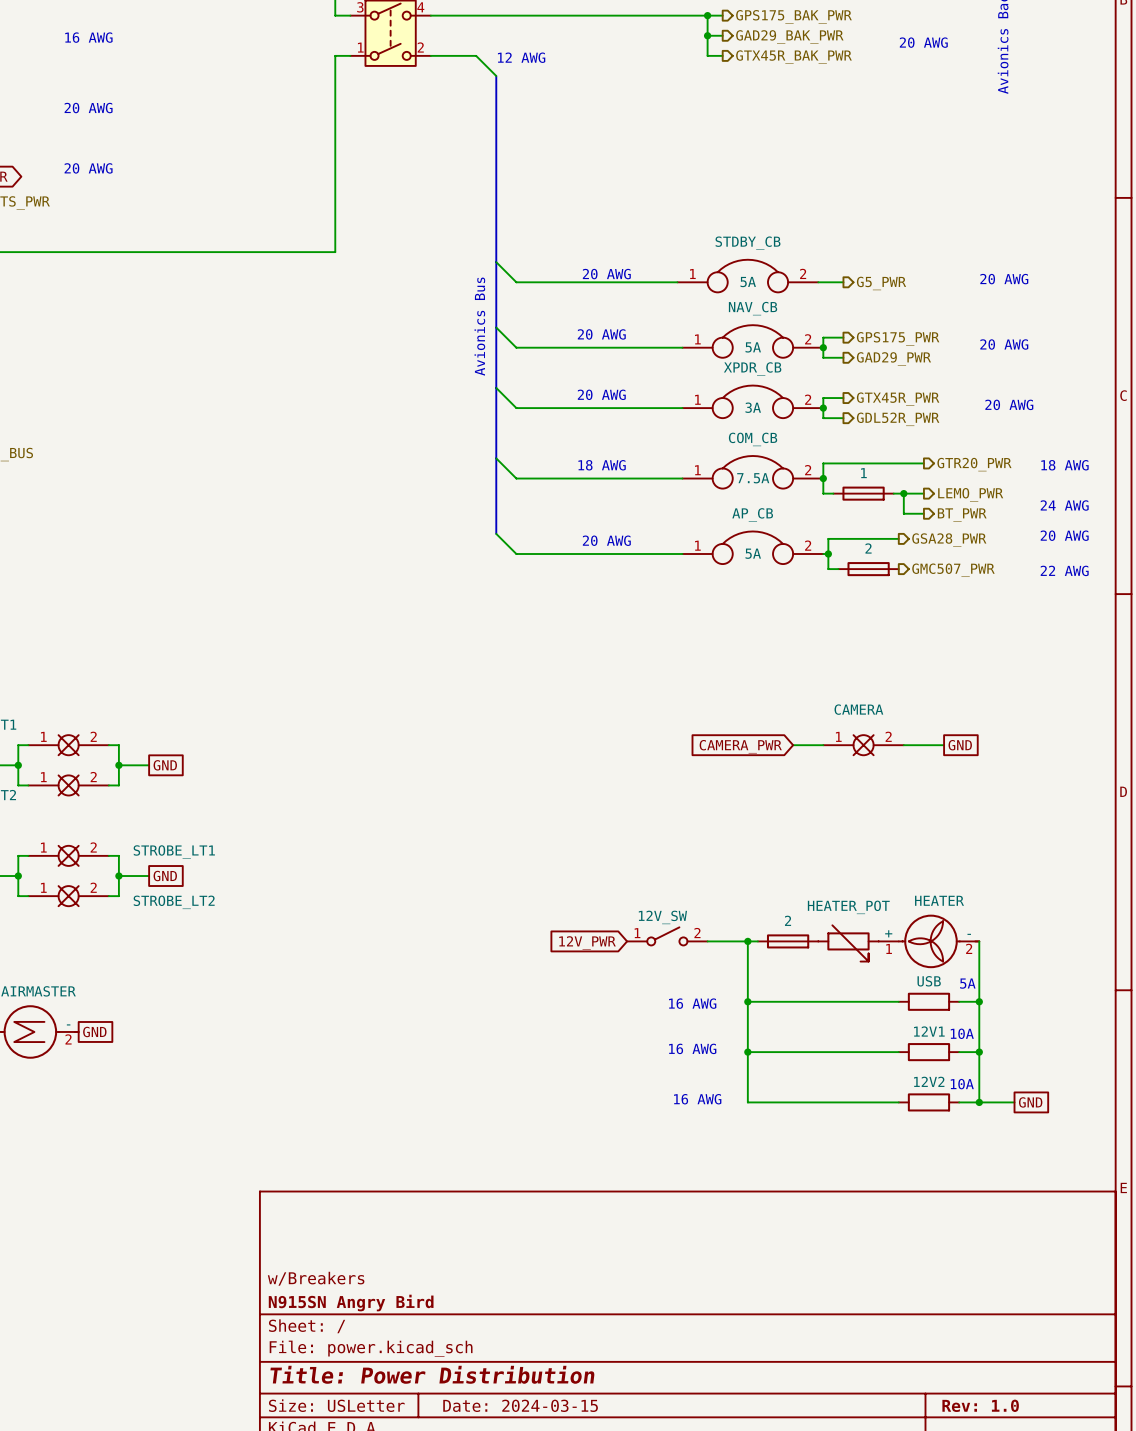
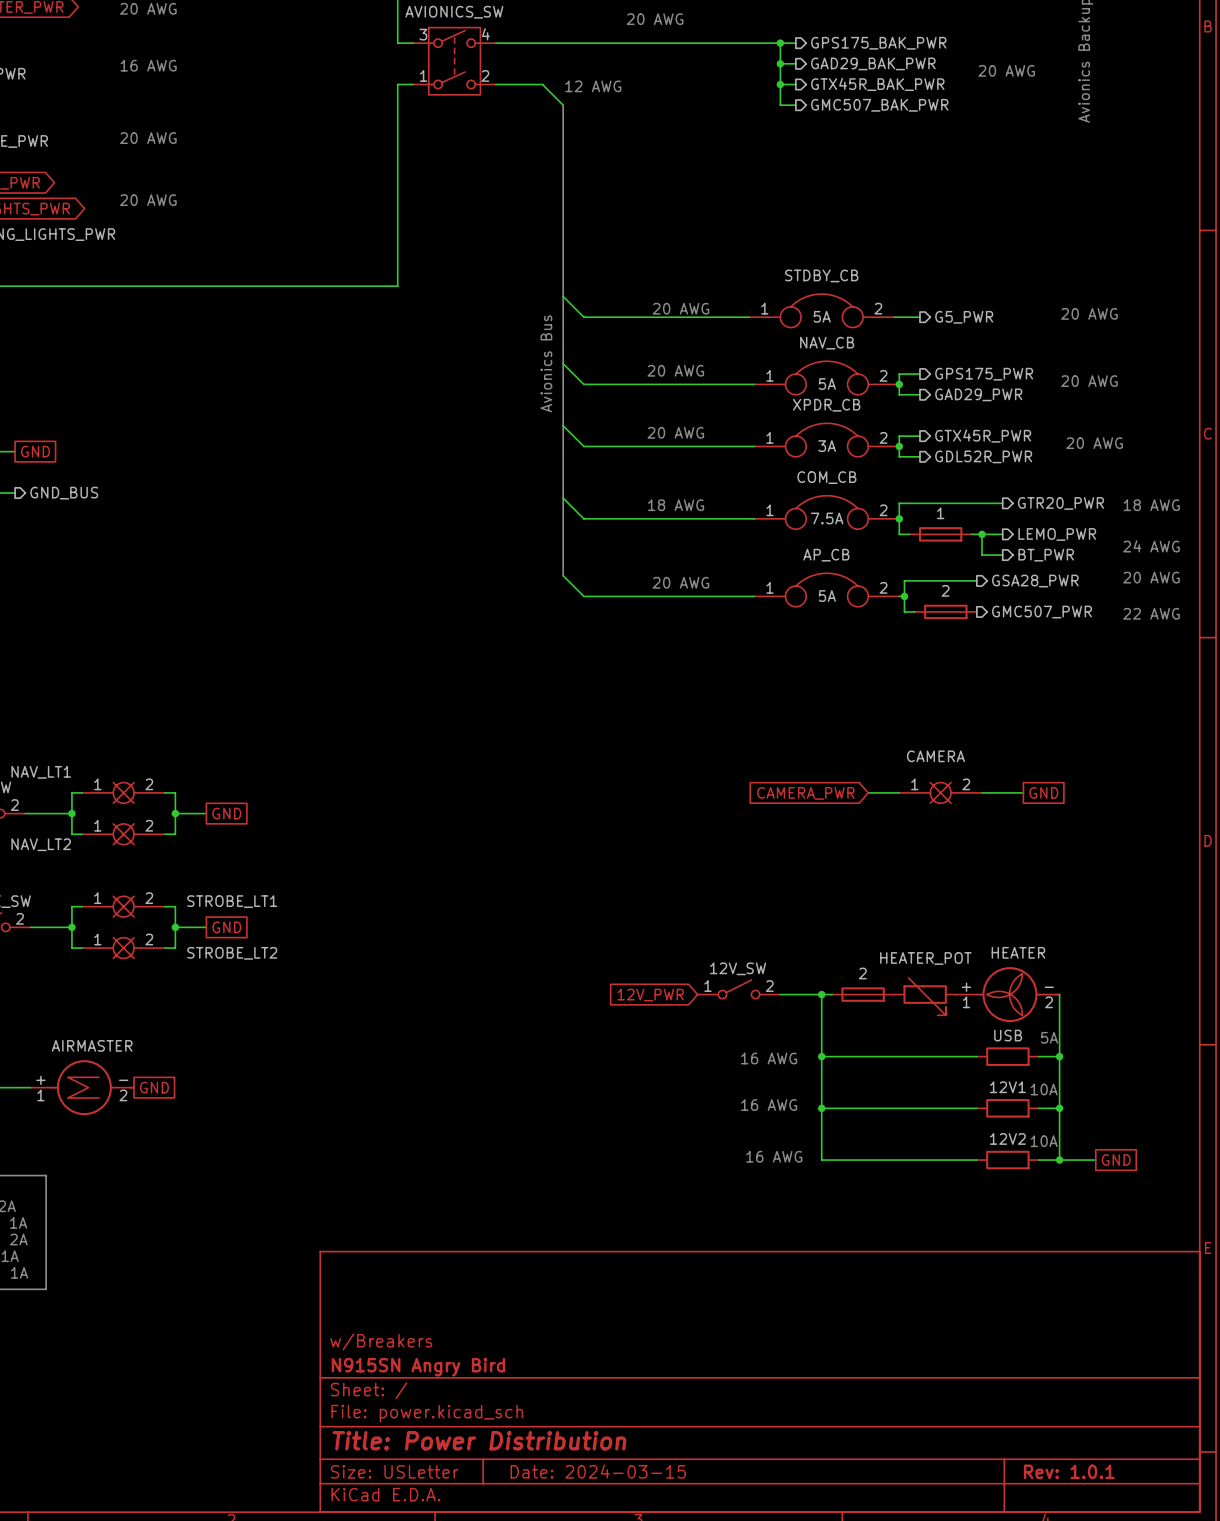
wire: none -> (780, 84) (780, 105) (795, 105)
junction: none -> (780, 84)
hierarchical label: none -> GMC507_BAK_PWR (879, 105)
title block: Rev: 1.0 (980, 1405) -> Rev: 1.0.1 (1069, 1471)

